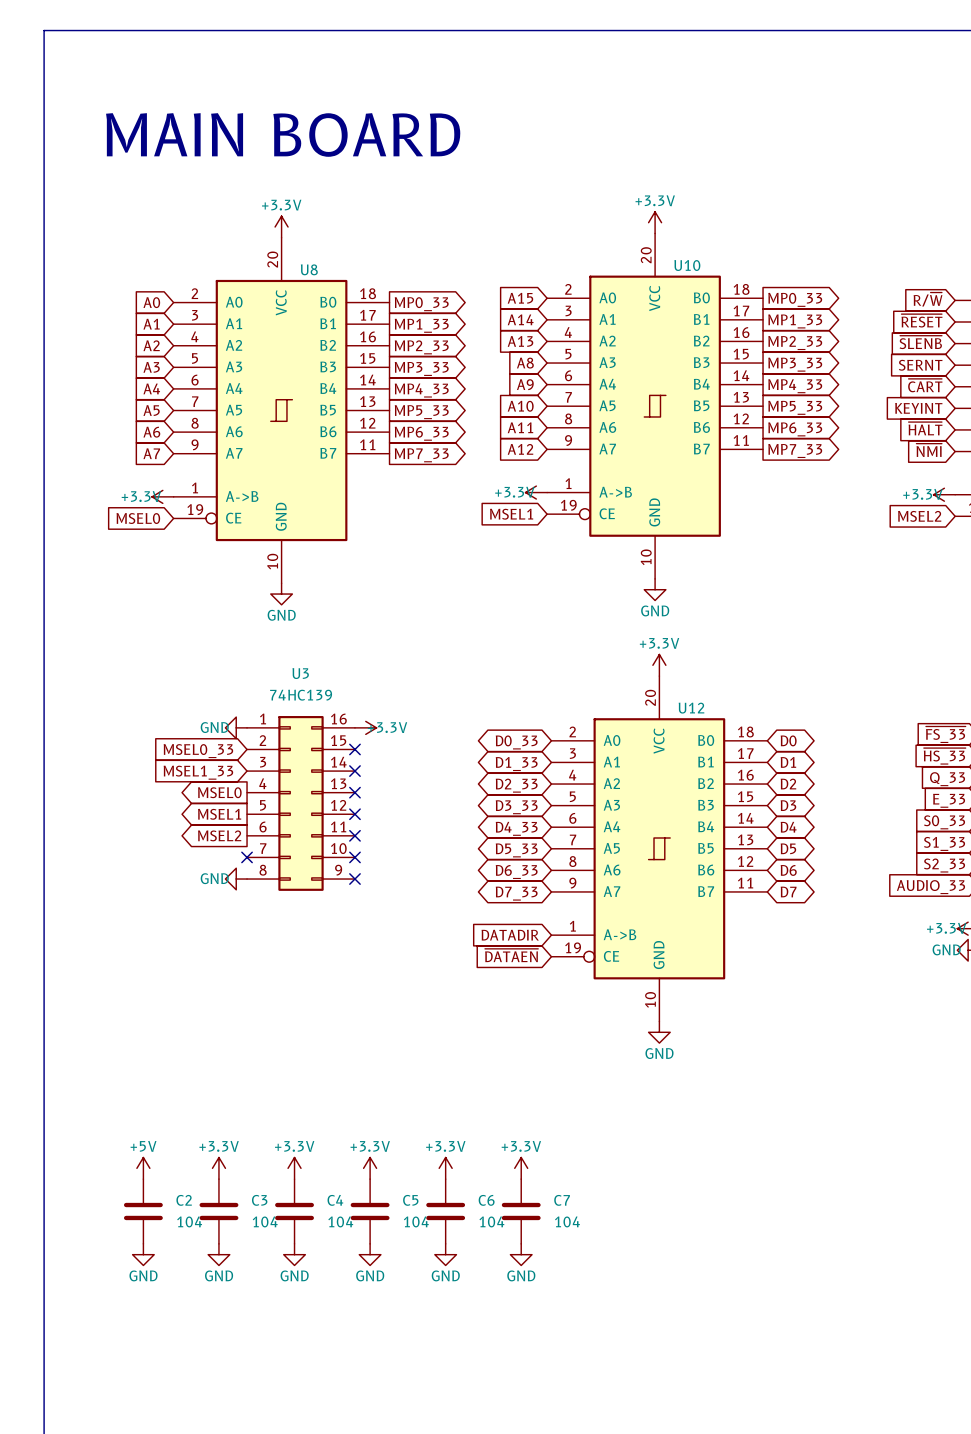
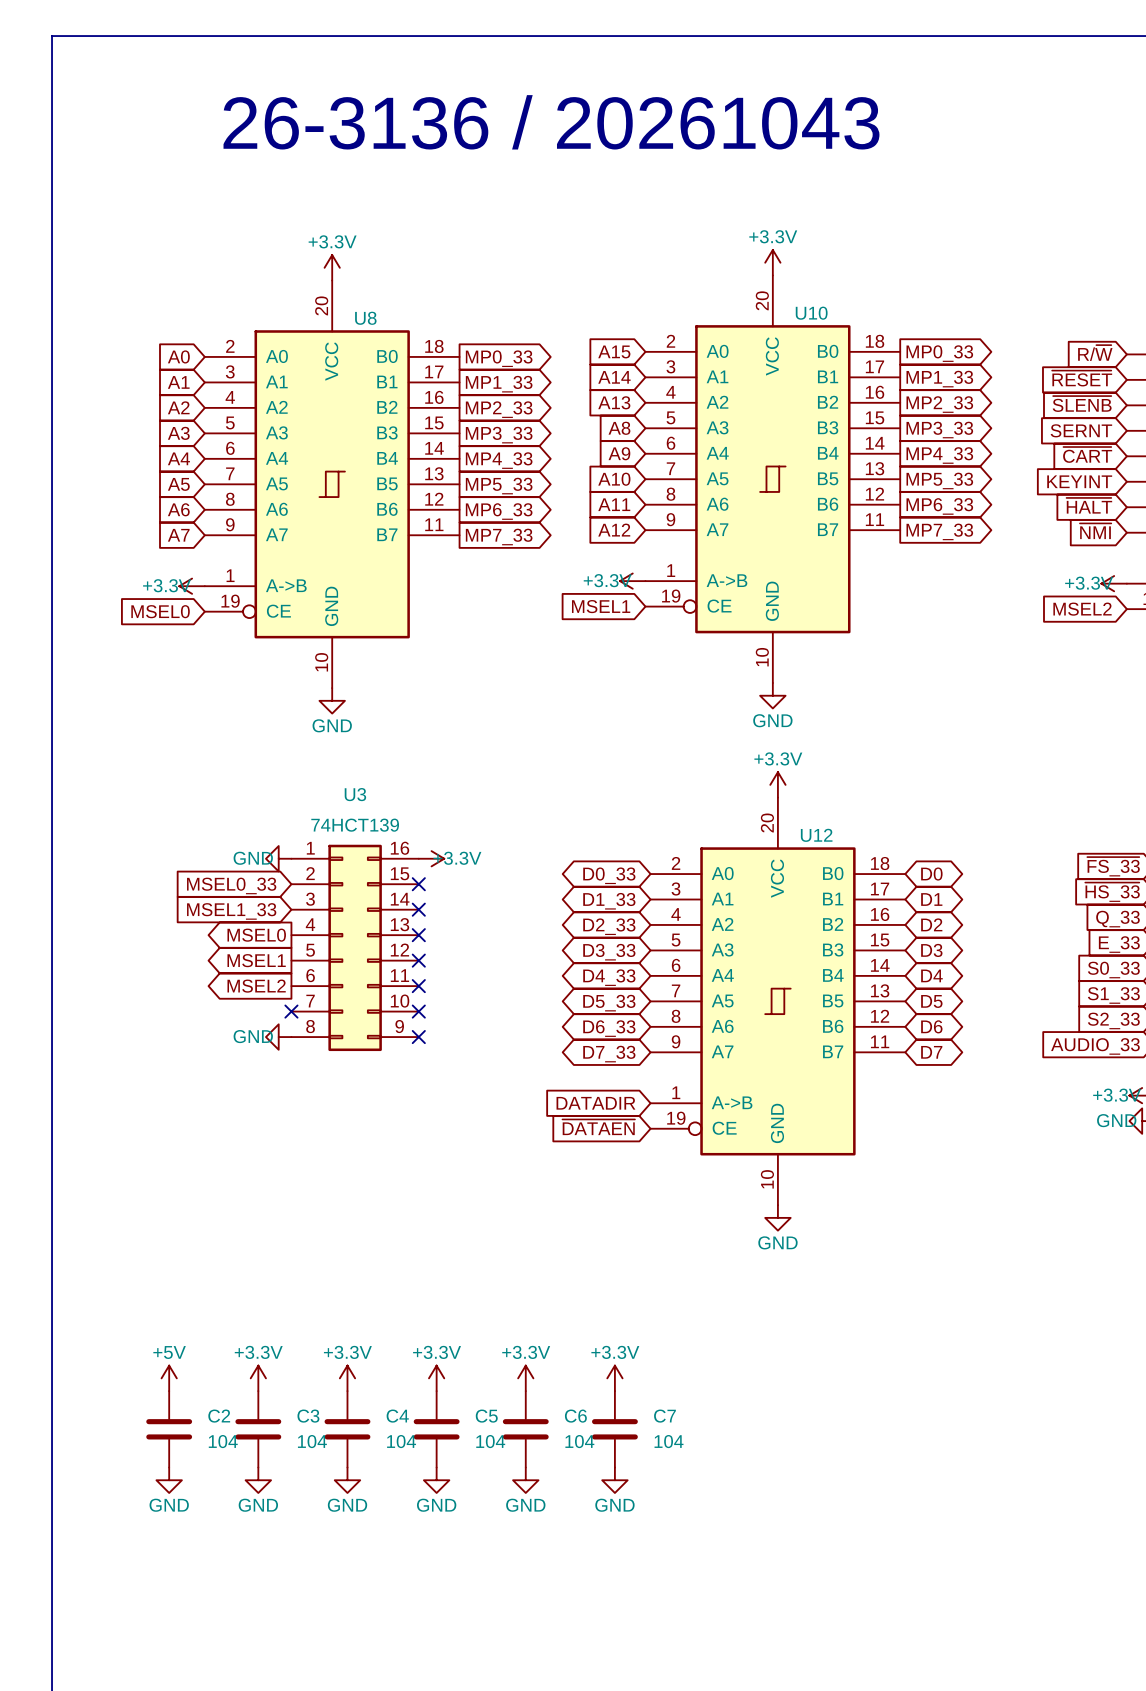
text: none -> 26-3136 / 20261043 (551, 122)
text: MAIN BOARD (283, 134) -> none
U3 value: 74HC139 (301, 695) -> 74HCT139 (355, 825)

